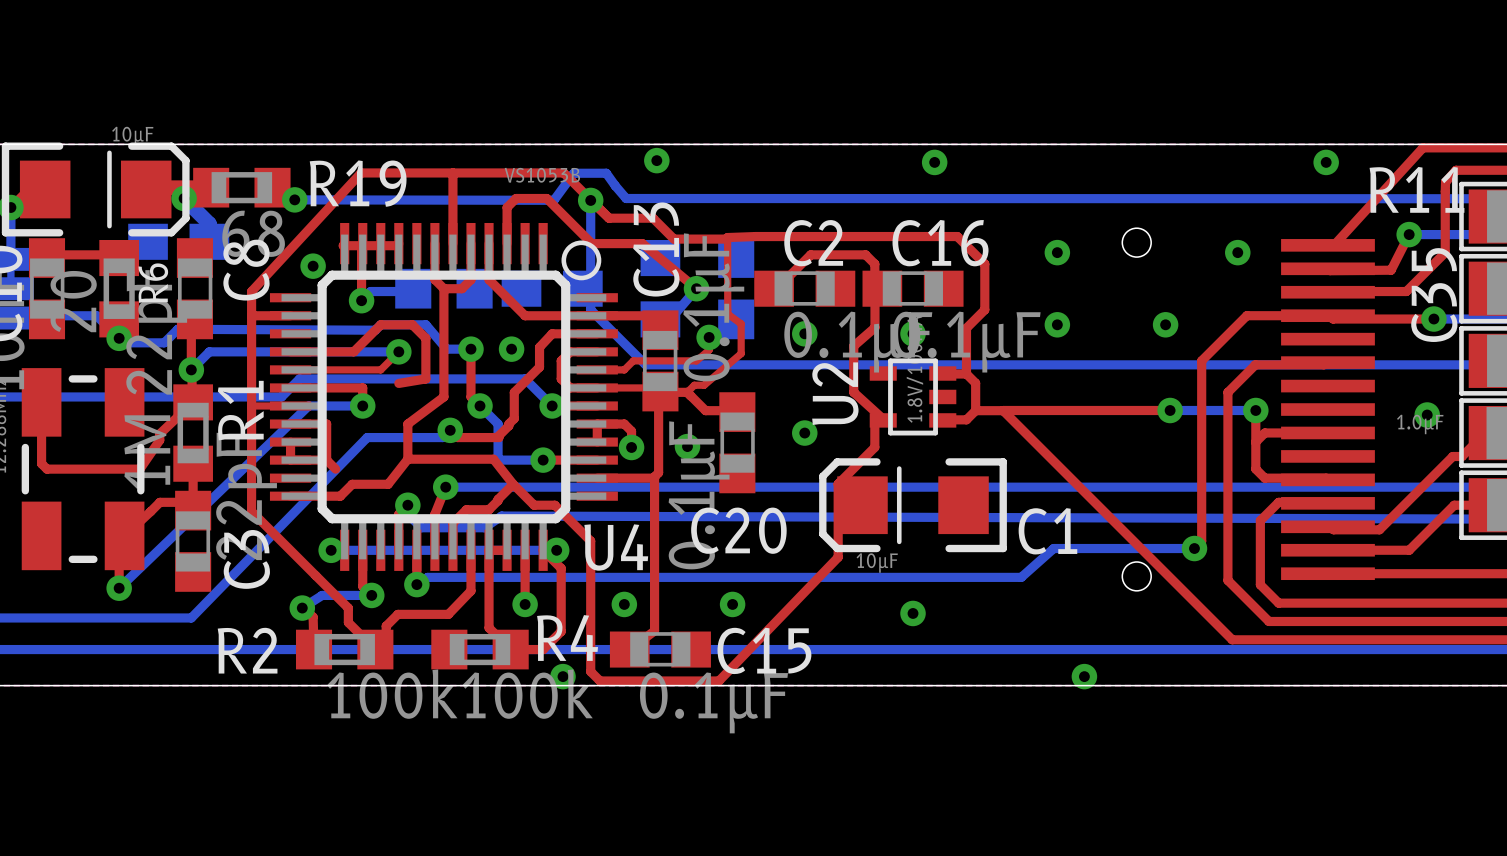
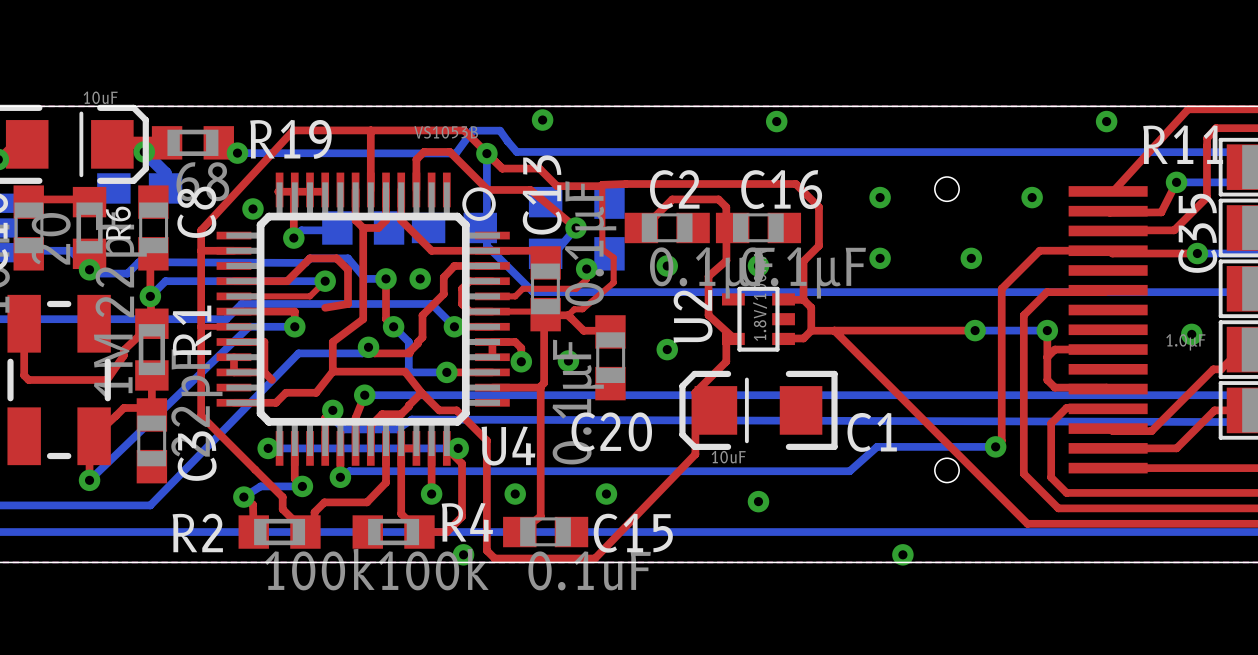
part value: 10µF (132, 136) -> 10uF (100, 97)
C1 value: 10µF (877, 563) -> 10uF (728, 457)
C15 value: 0.1µF (713, 702) -> 0.1uF (589, 570)

